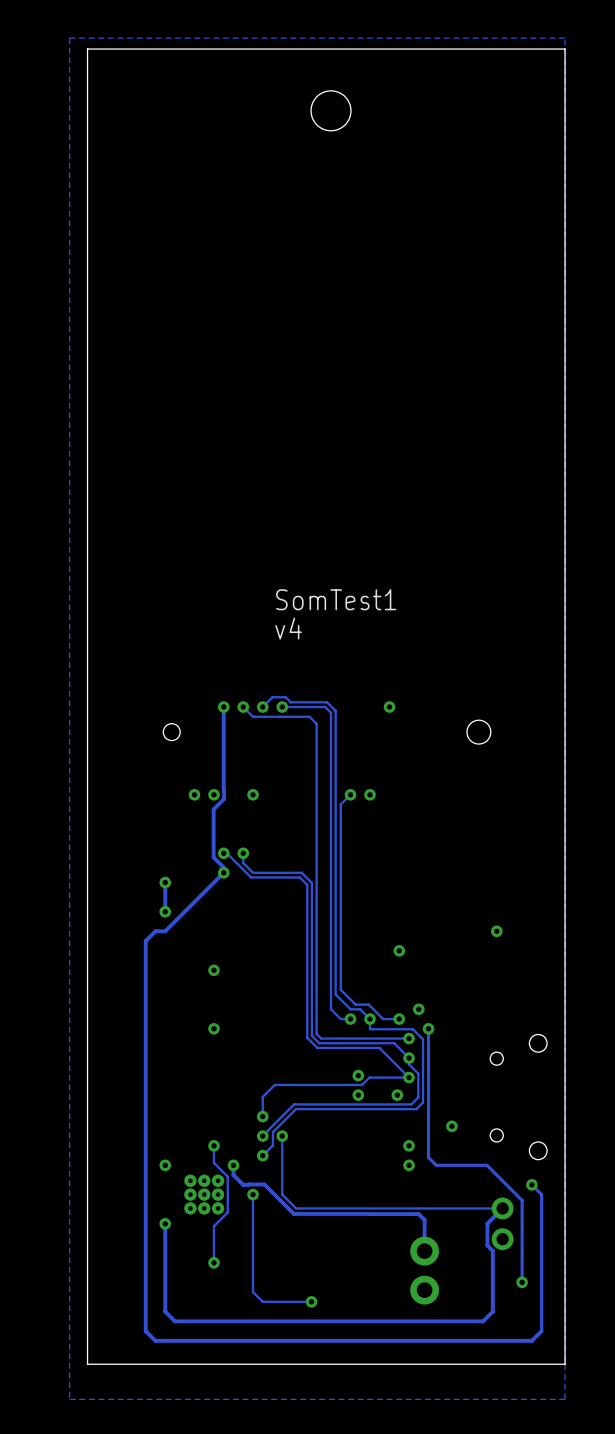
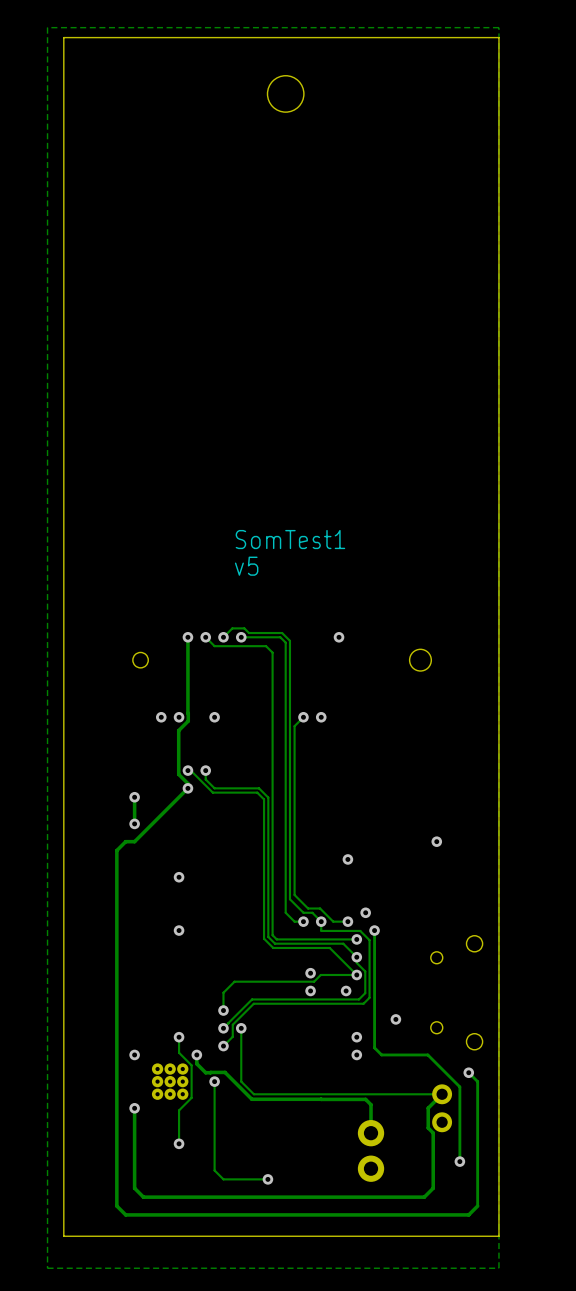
text: v4 (288, 628) -> v5 (246, 566)

